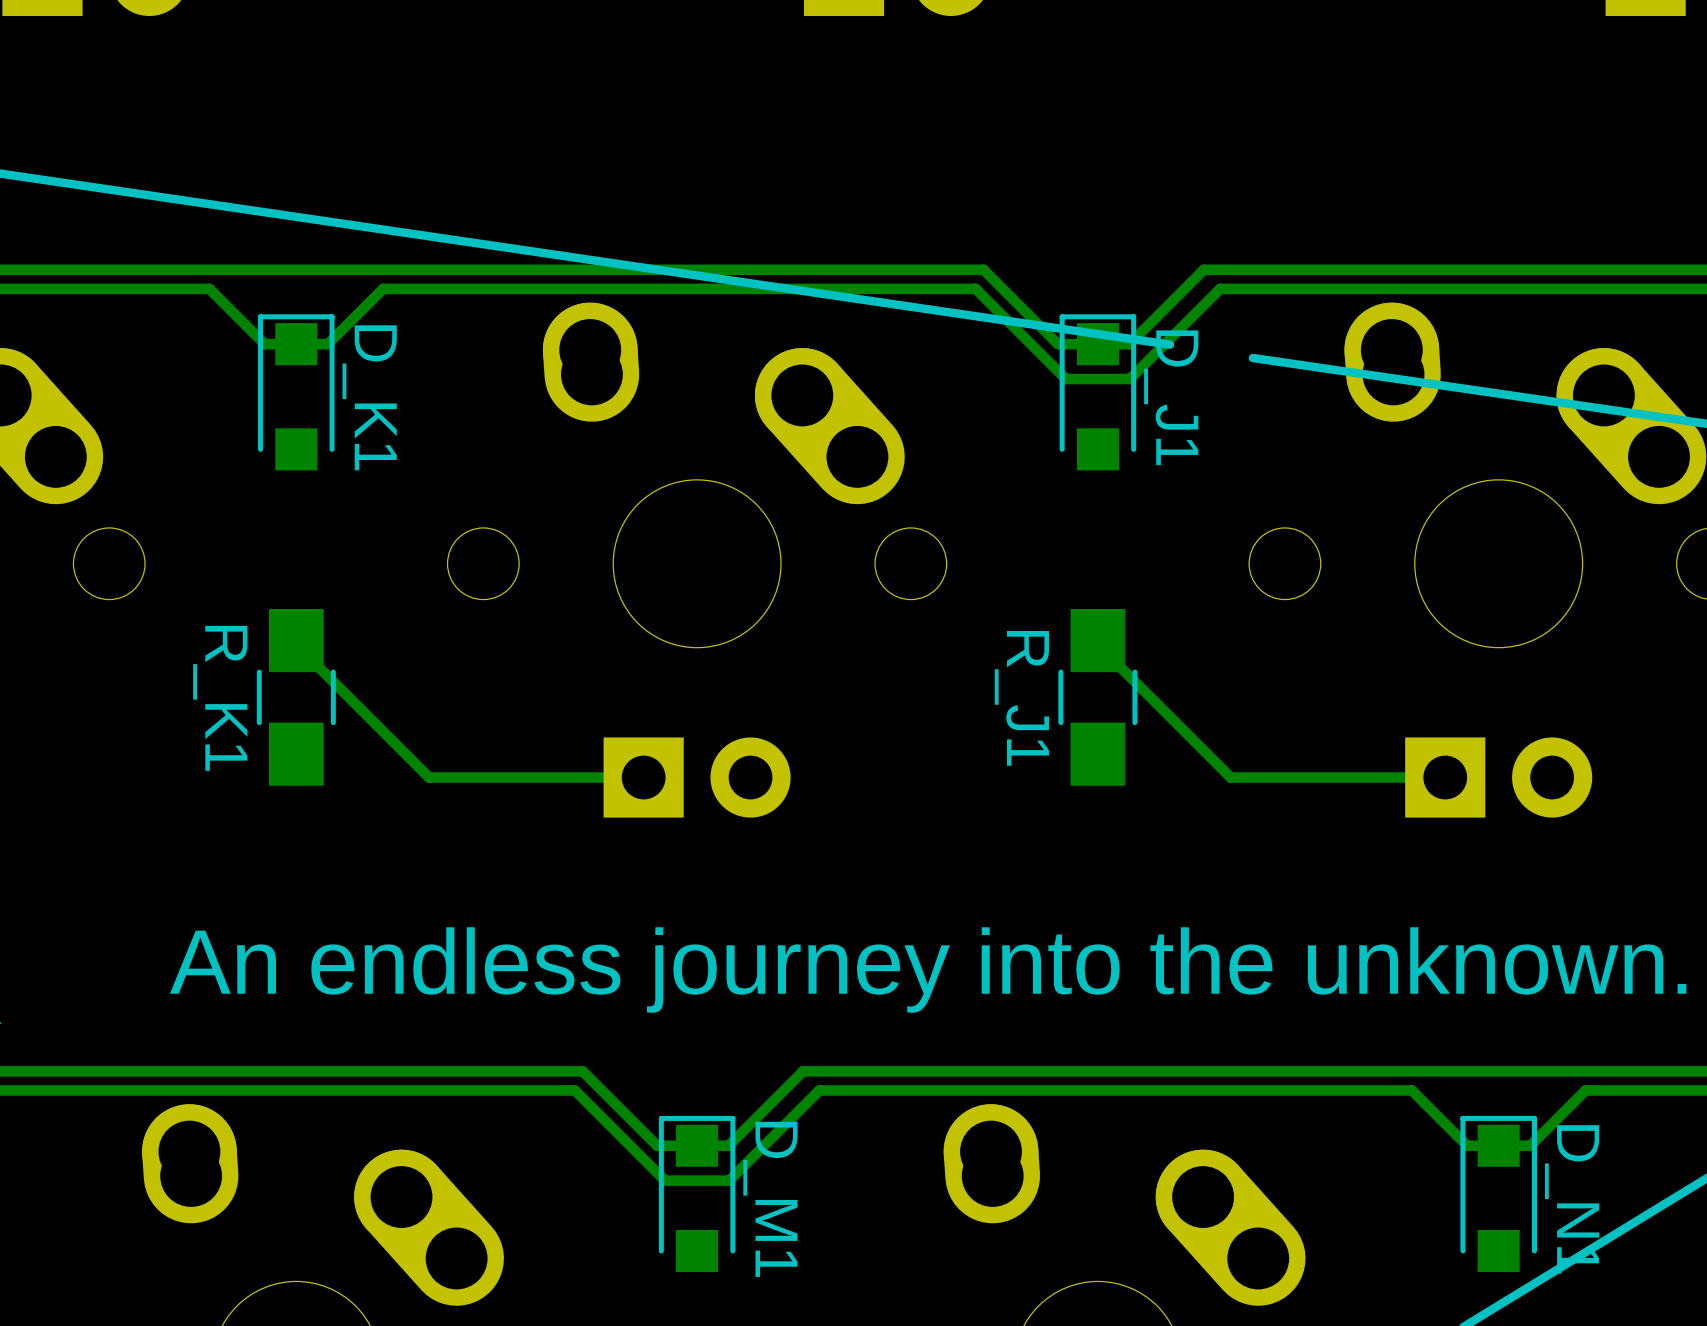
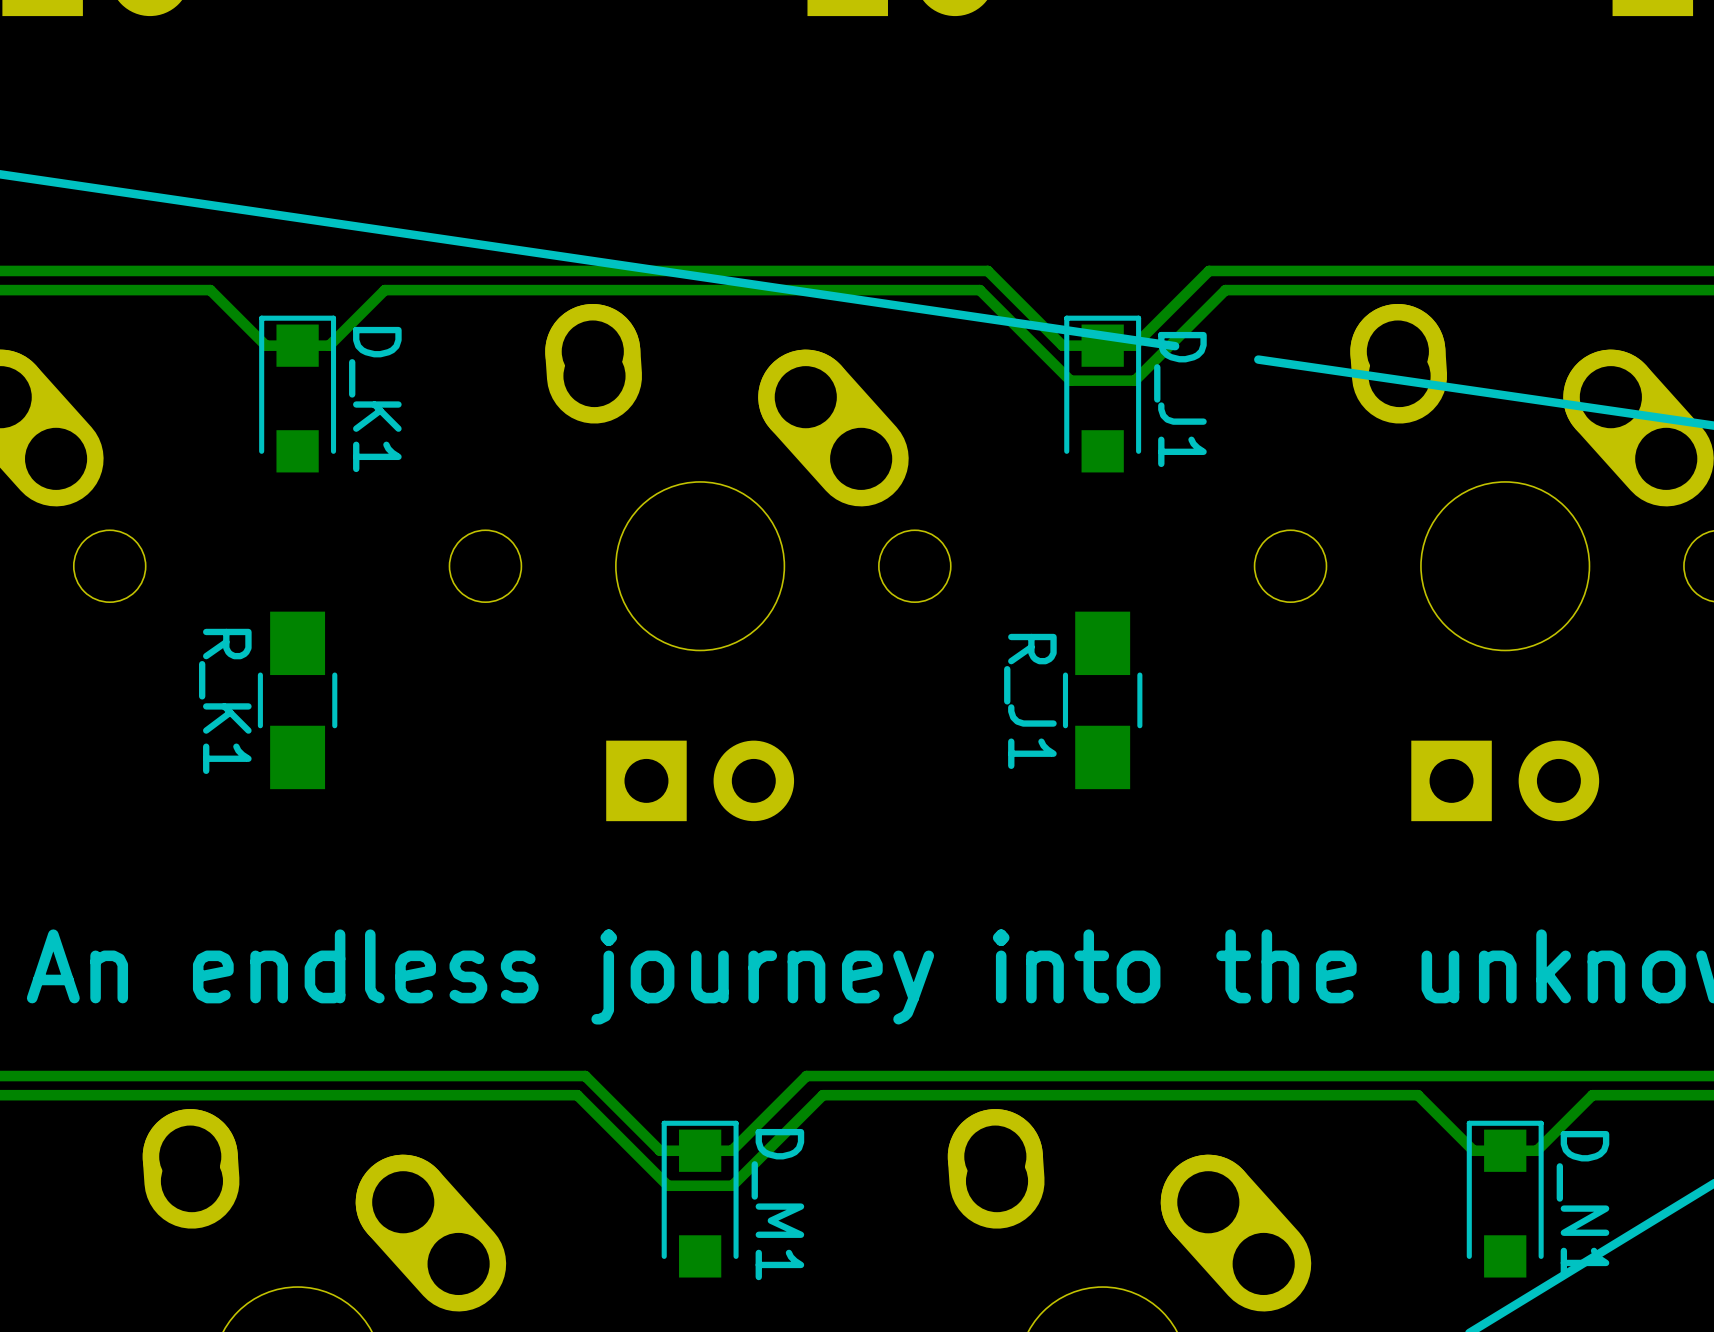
bottom track: (296, 640) (296, 644) (429, 777) (643, 777) -> none
bottom track: (1097, 640) (1097, 644) (1230, 777) (1445, 777) -> none

